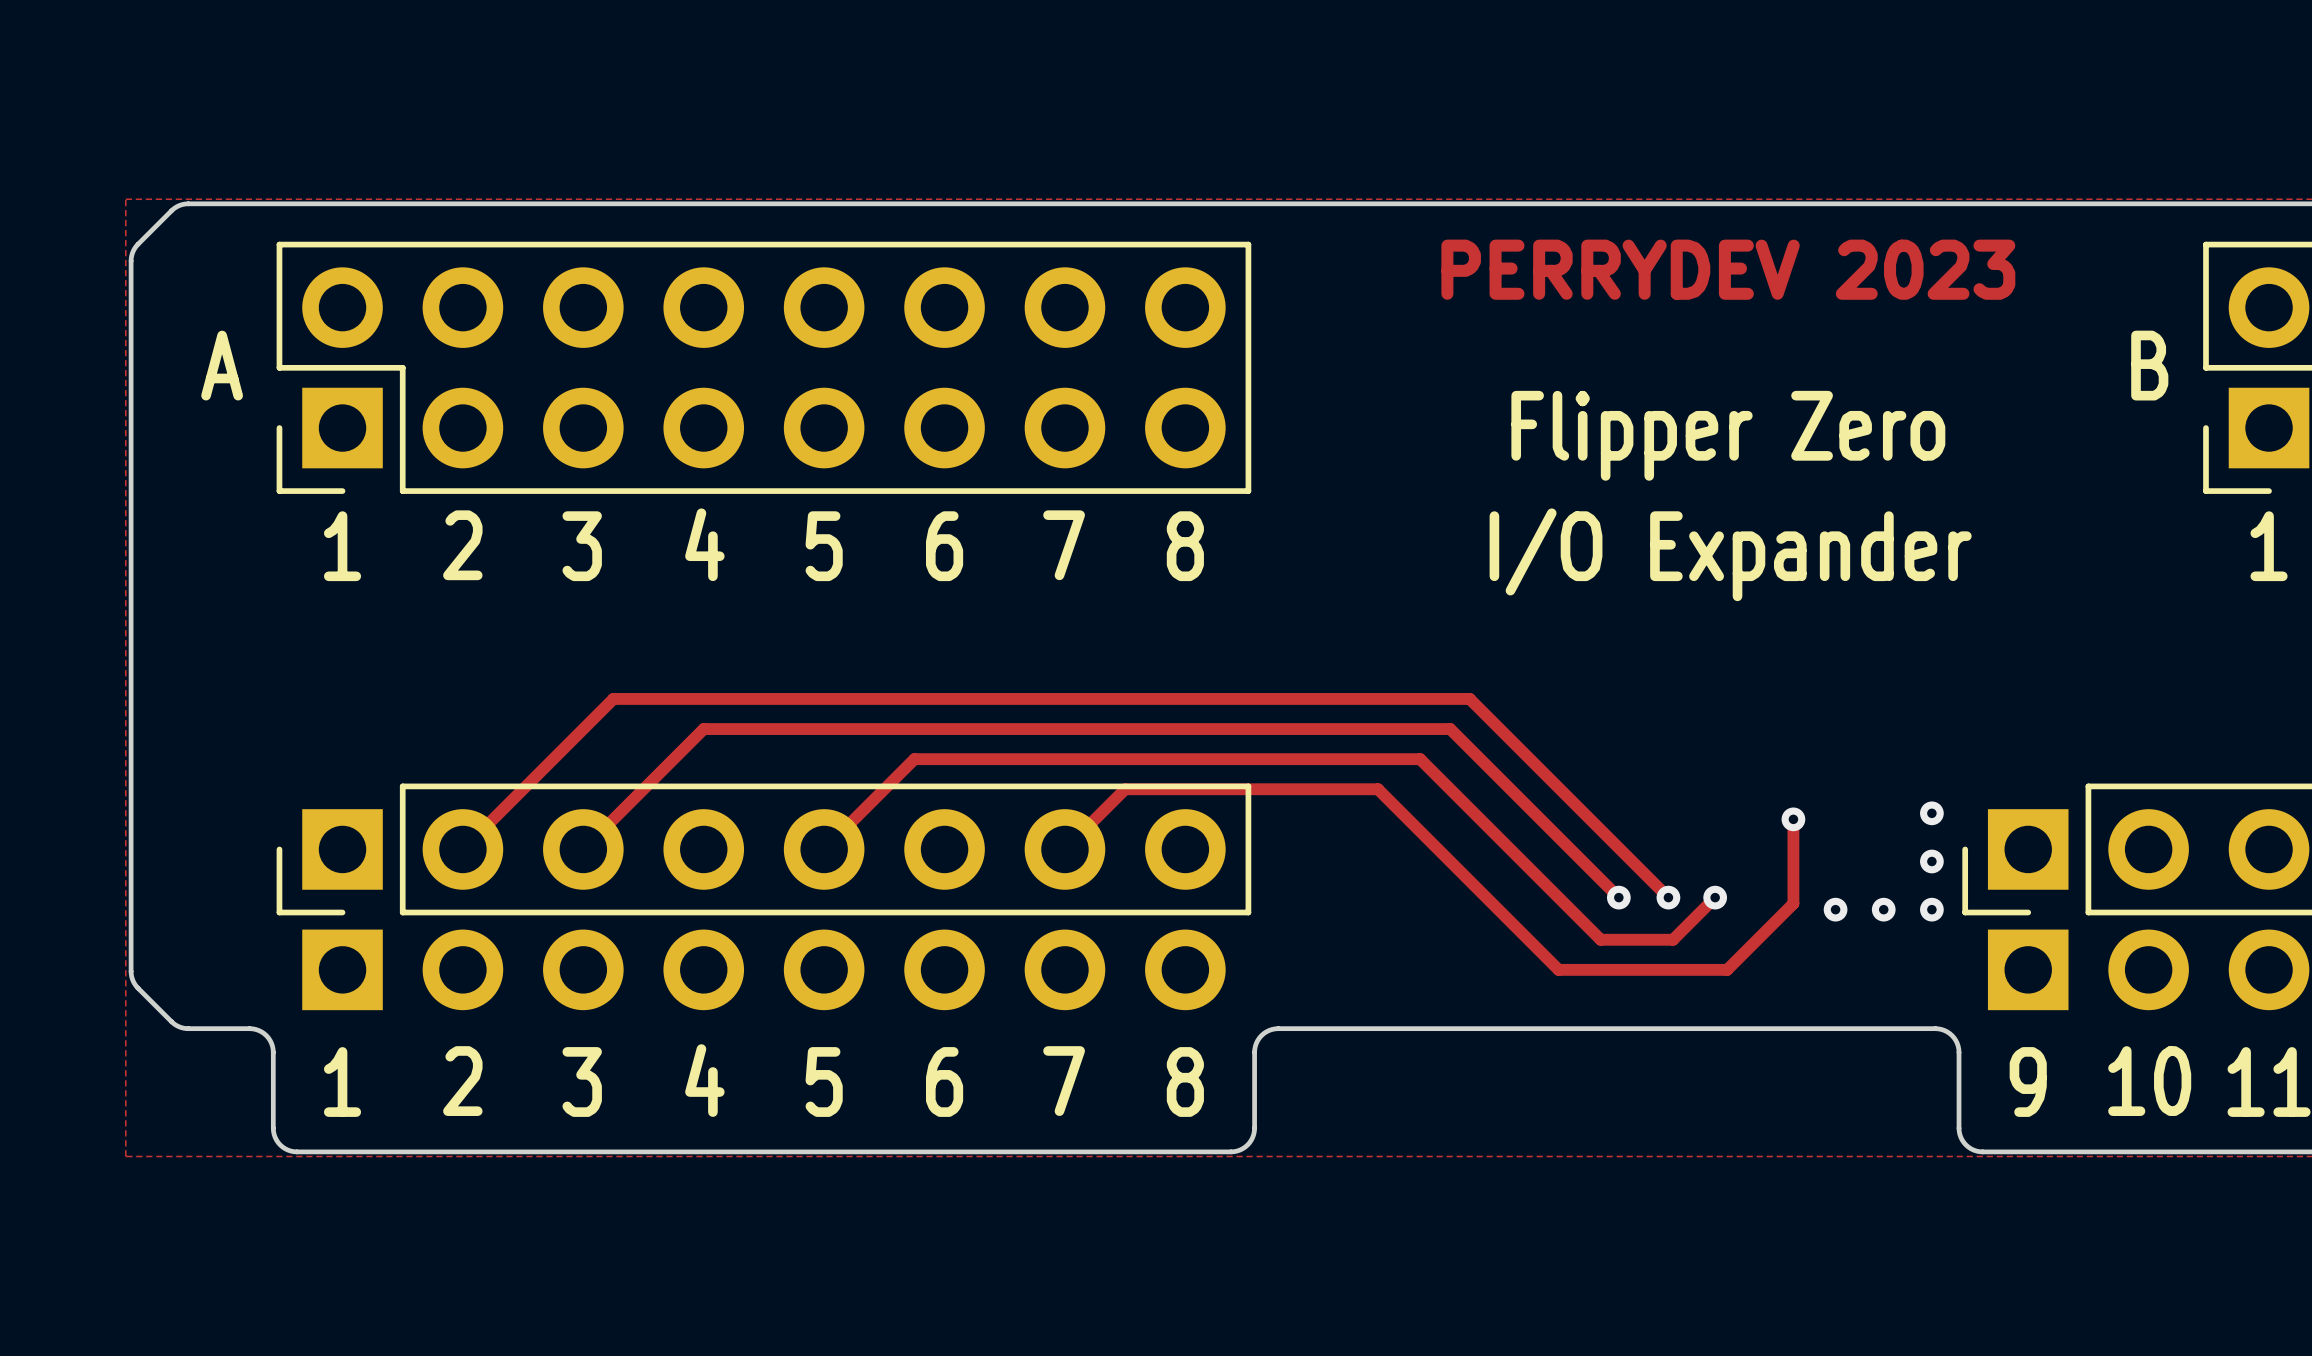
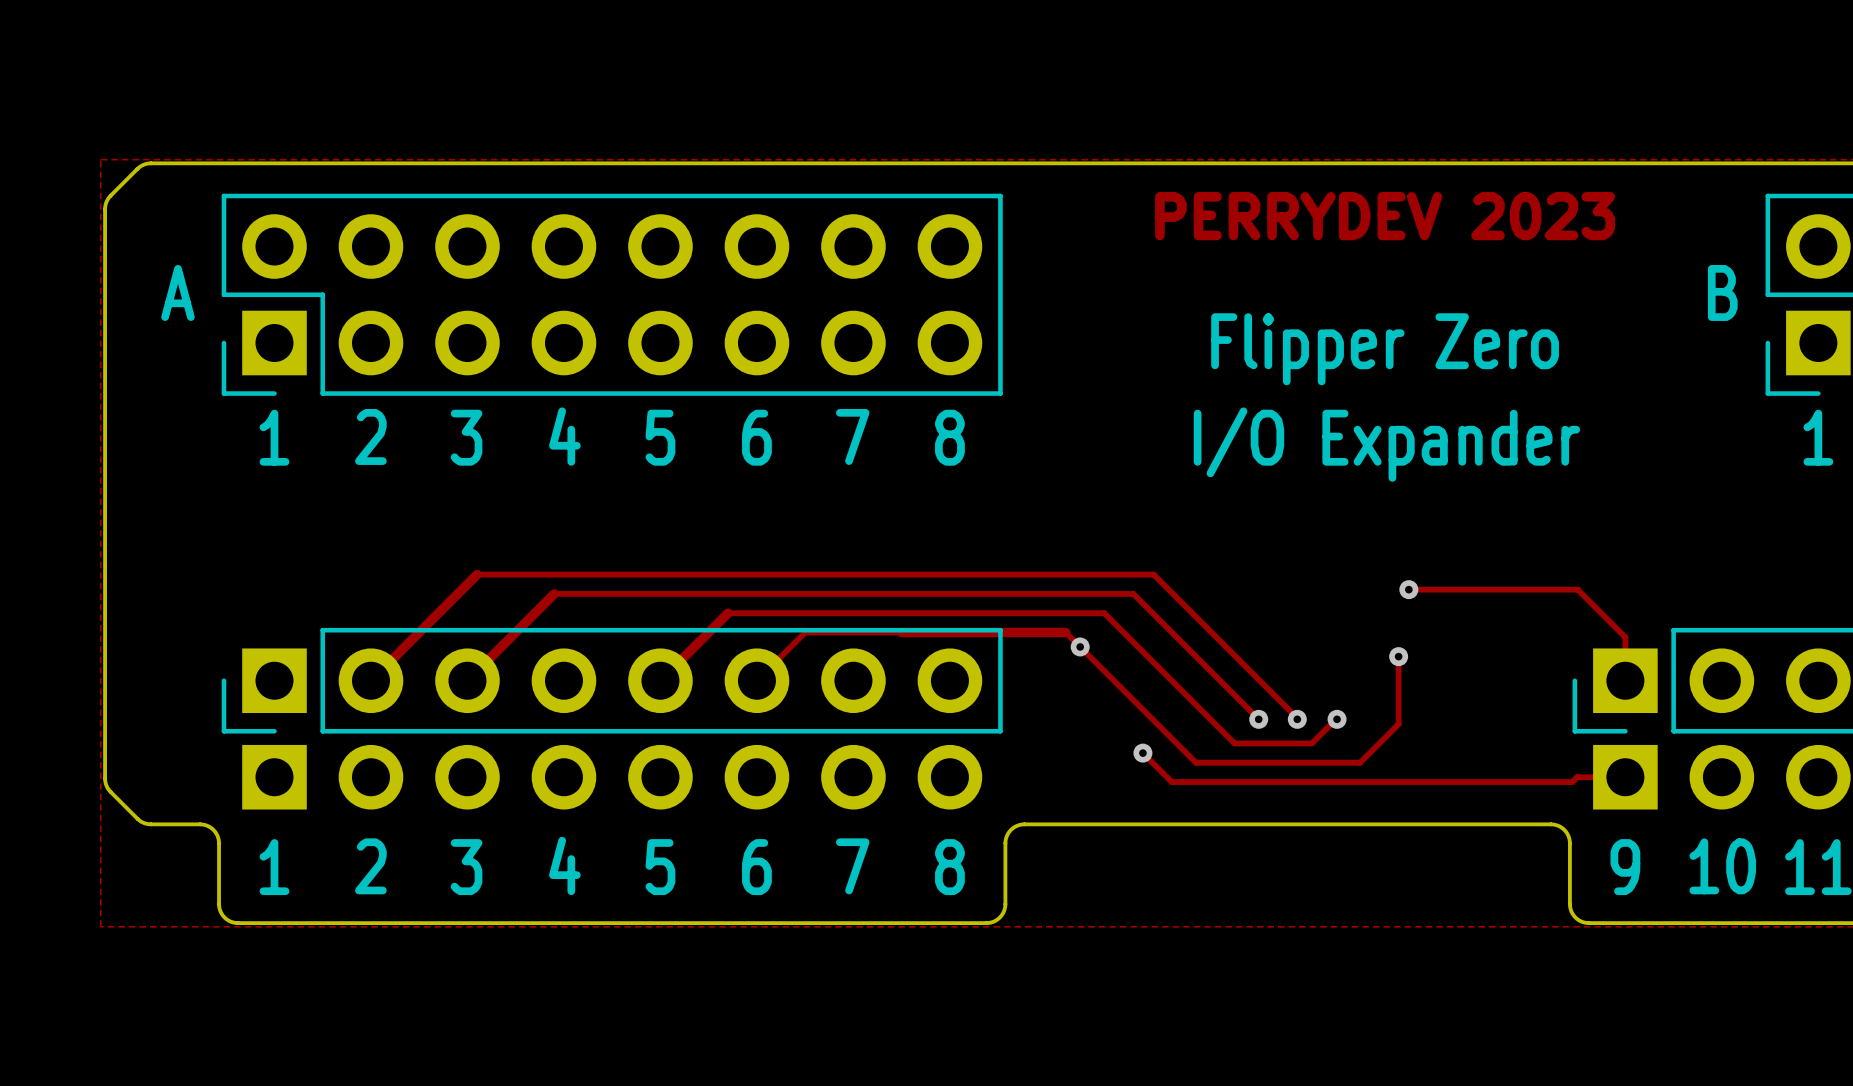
track: (595, 717) (613, 698) (1469, 698) (1668, 897) -> (477, 574) (1153, 574) (1298, 719)
track: none -> (1408, 589) (1577, 589) (1625, 637) (1625, 680)
via: none -> (1408, 589)
track: (691, 741) (703, 729) (1450, 729) (1618, 897) -> (554, 593) (1133, 593) (1258, 719)
track: (908, 765) (914, 759) (1420, 759) (1600, 939) (1673, 939) (1715, 897) -> (728, 613) (1104, 613) (1234, 743) (1311, 743) (1335, 719)
track: (1125, 789) (1064, 849) -> (901, 632) (805, 632) (756, 680)
track: (1329, 789) (1378, 789) (1558, 969) (1727, 969) (1793, 903) (1793, 819) -> (1065, 632) (1195, 762) (1360, 762) (1398, 724) (1398, 656)
via: none -> (1080, 646)
via: (1931, 813) -> none
via: none -> (1398, 656)
via: (1793, 819) -> none
via: (1931, 861) -> none
via: none -> (1258, 719)
via: (1715, 897) -> none
via: (1835, 909) -> none
via: (1883, 909) -> none
via: (1931, 909) -> none
track: none -> (1142, 753) (1171, 782) (1572, 782) (1577, 777) (1625, 777)
via: none -> (1142, 753)

